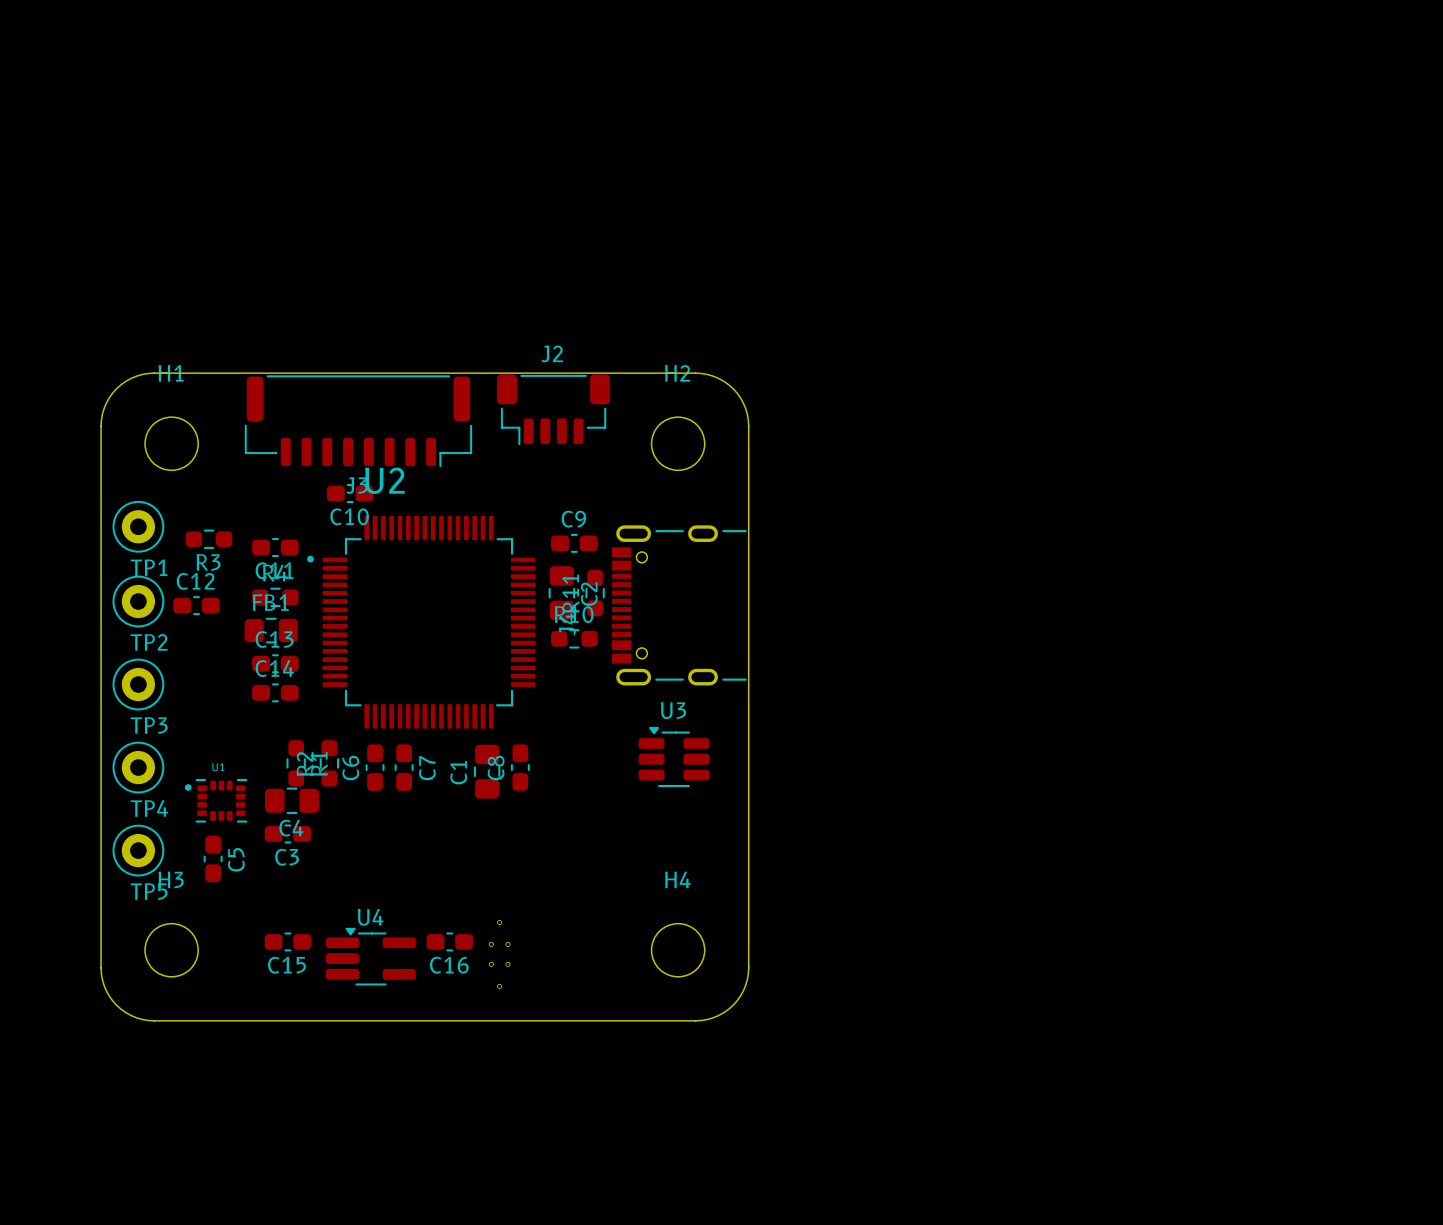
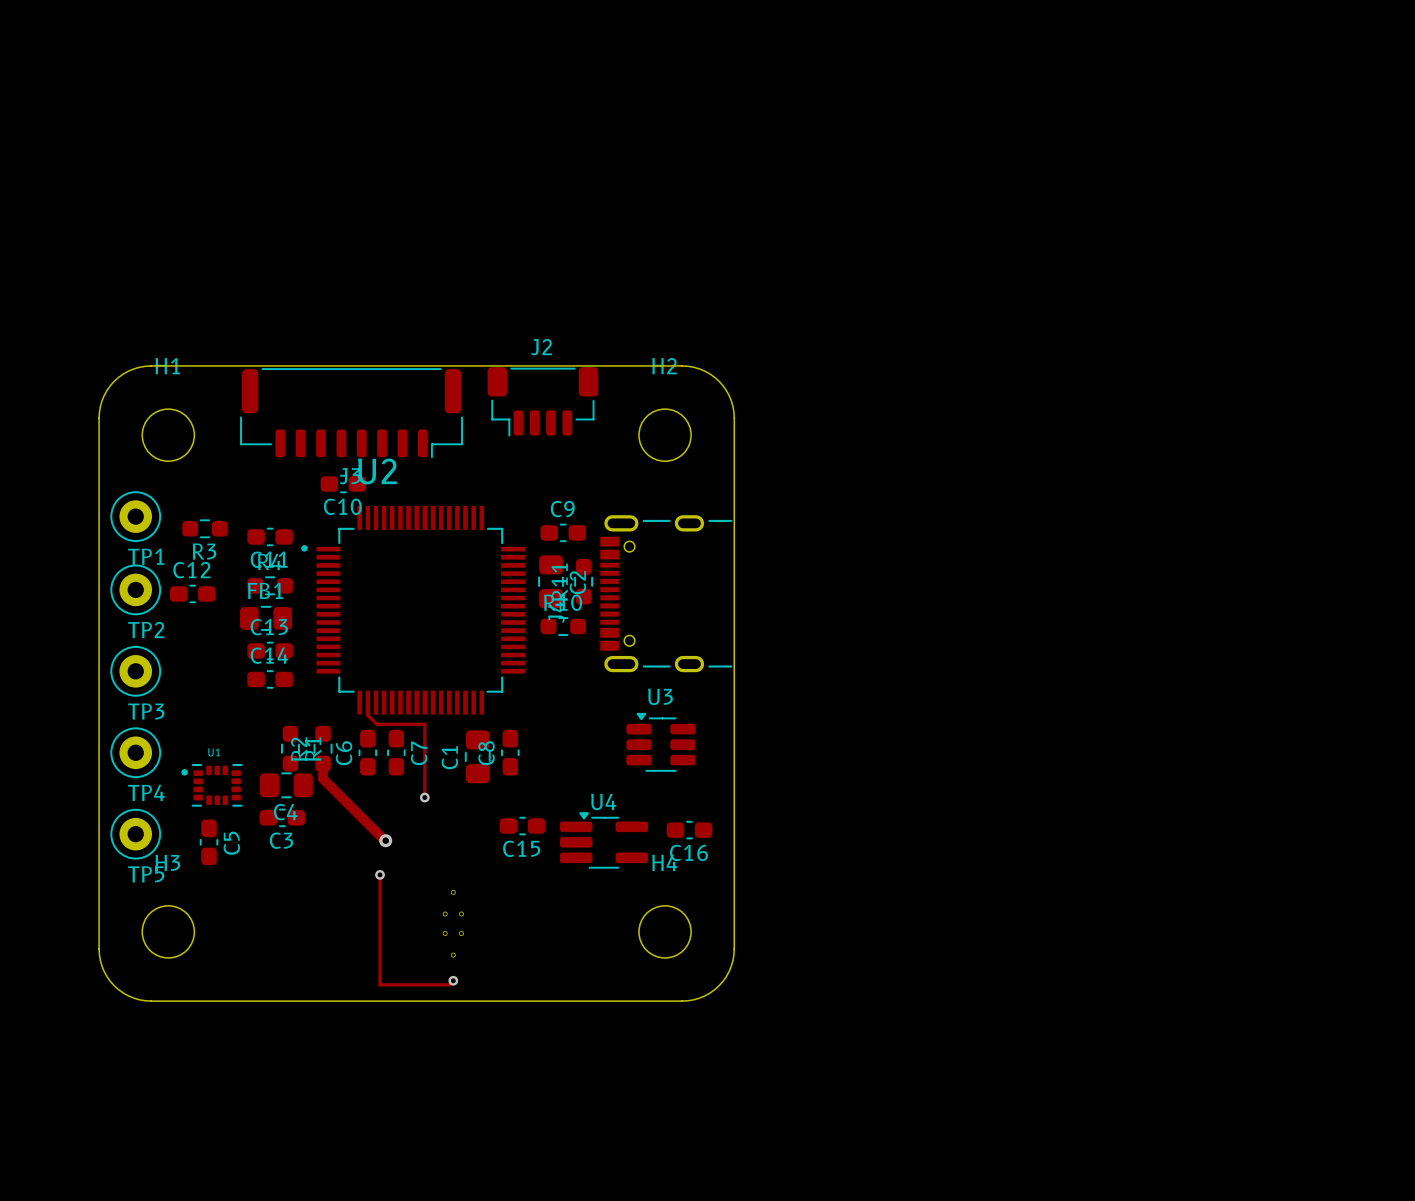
track: none -> (367, 702) (367, 715) (376, 724) (424, 724) (424, 797)
track: none -> (323, 763) (323, 778) (385, 840)
via: none -> (424, 797)
via: none -> (385, 840)
track: none -> (380, 874) (380, 984) (449, 984) (453, 980)
via: none -> (380, 874)
C15 position: (287, 941) -> (522, 826)
C16 position: (449, 941) -> (689, 830)
part position: (499, 954) -> (453, 923)
U4 position: (370, 956) -> (603, 840)
via: none -> (453, 980)

